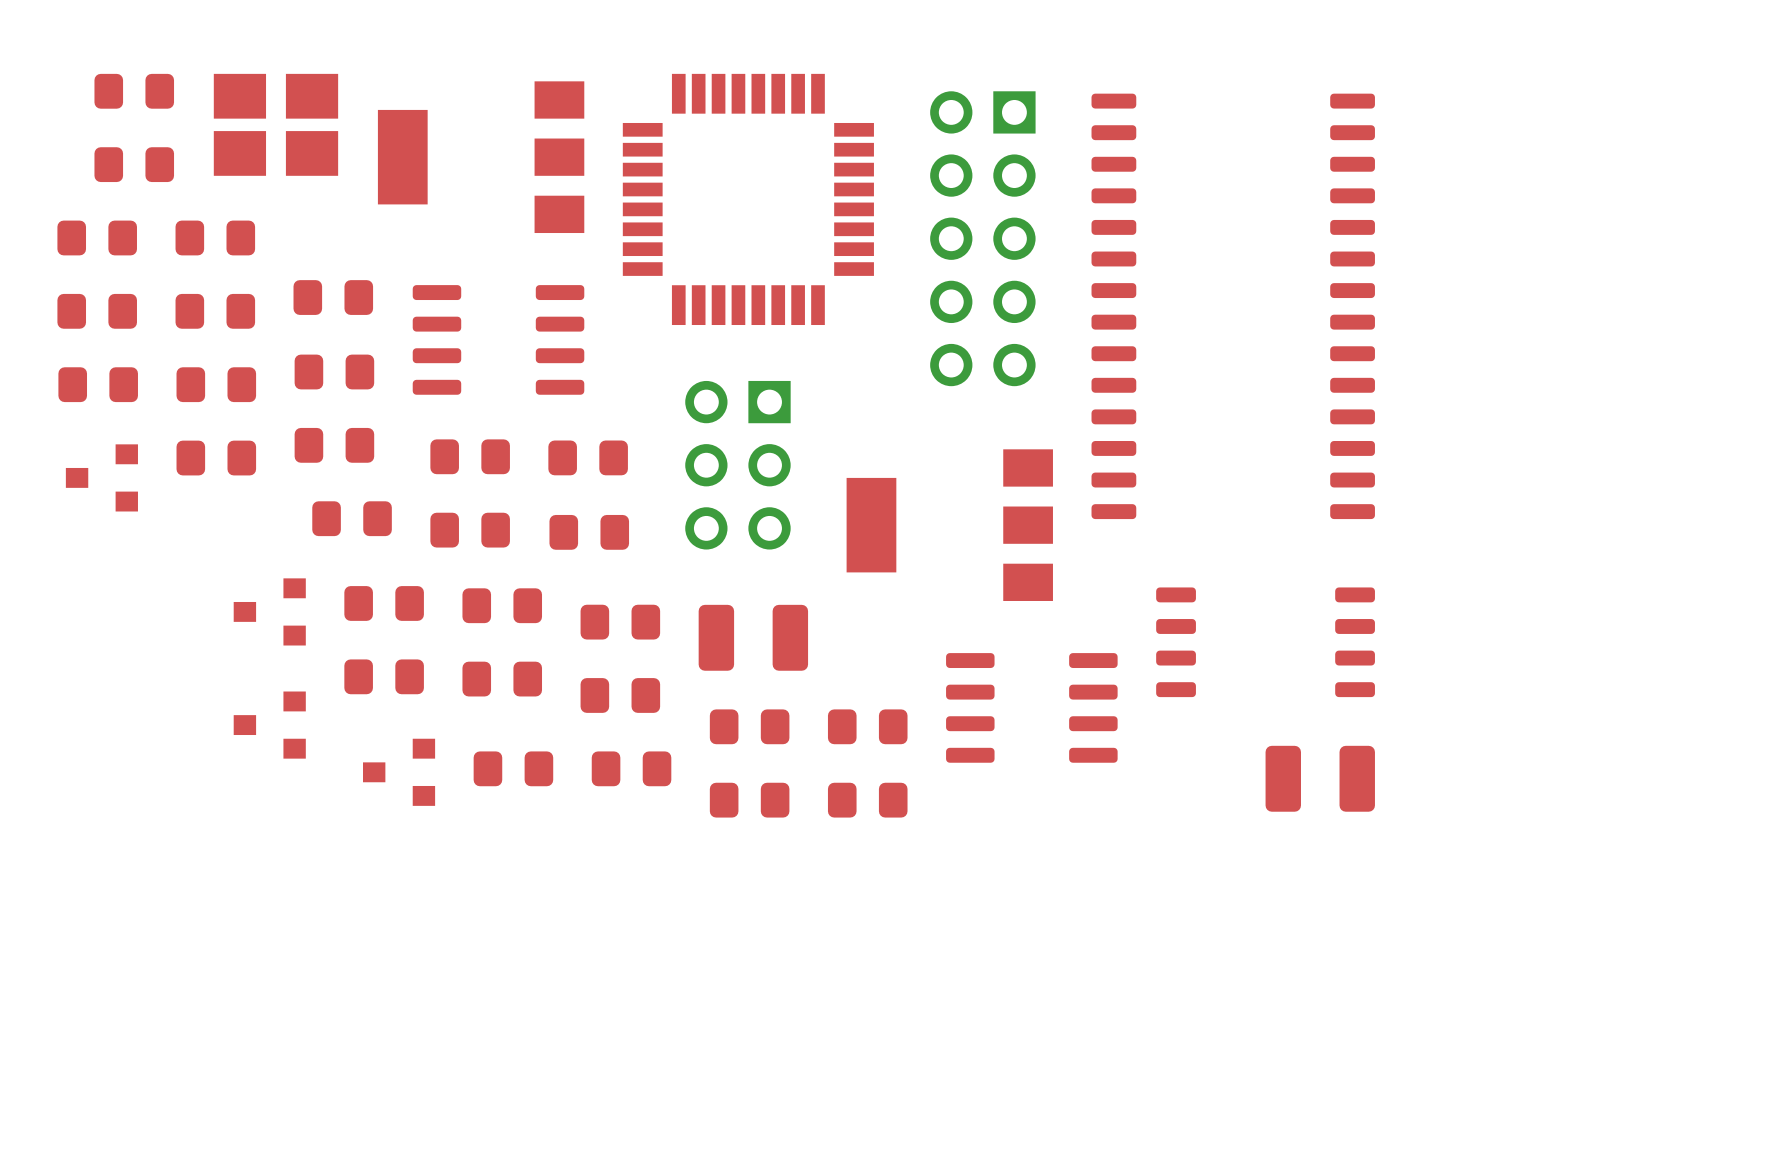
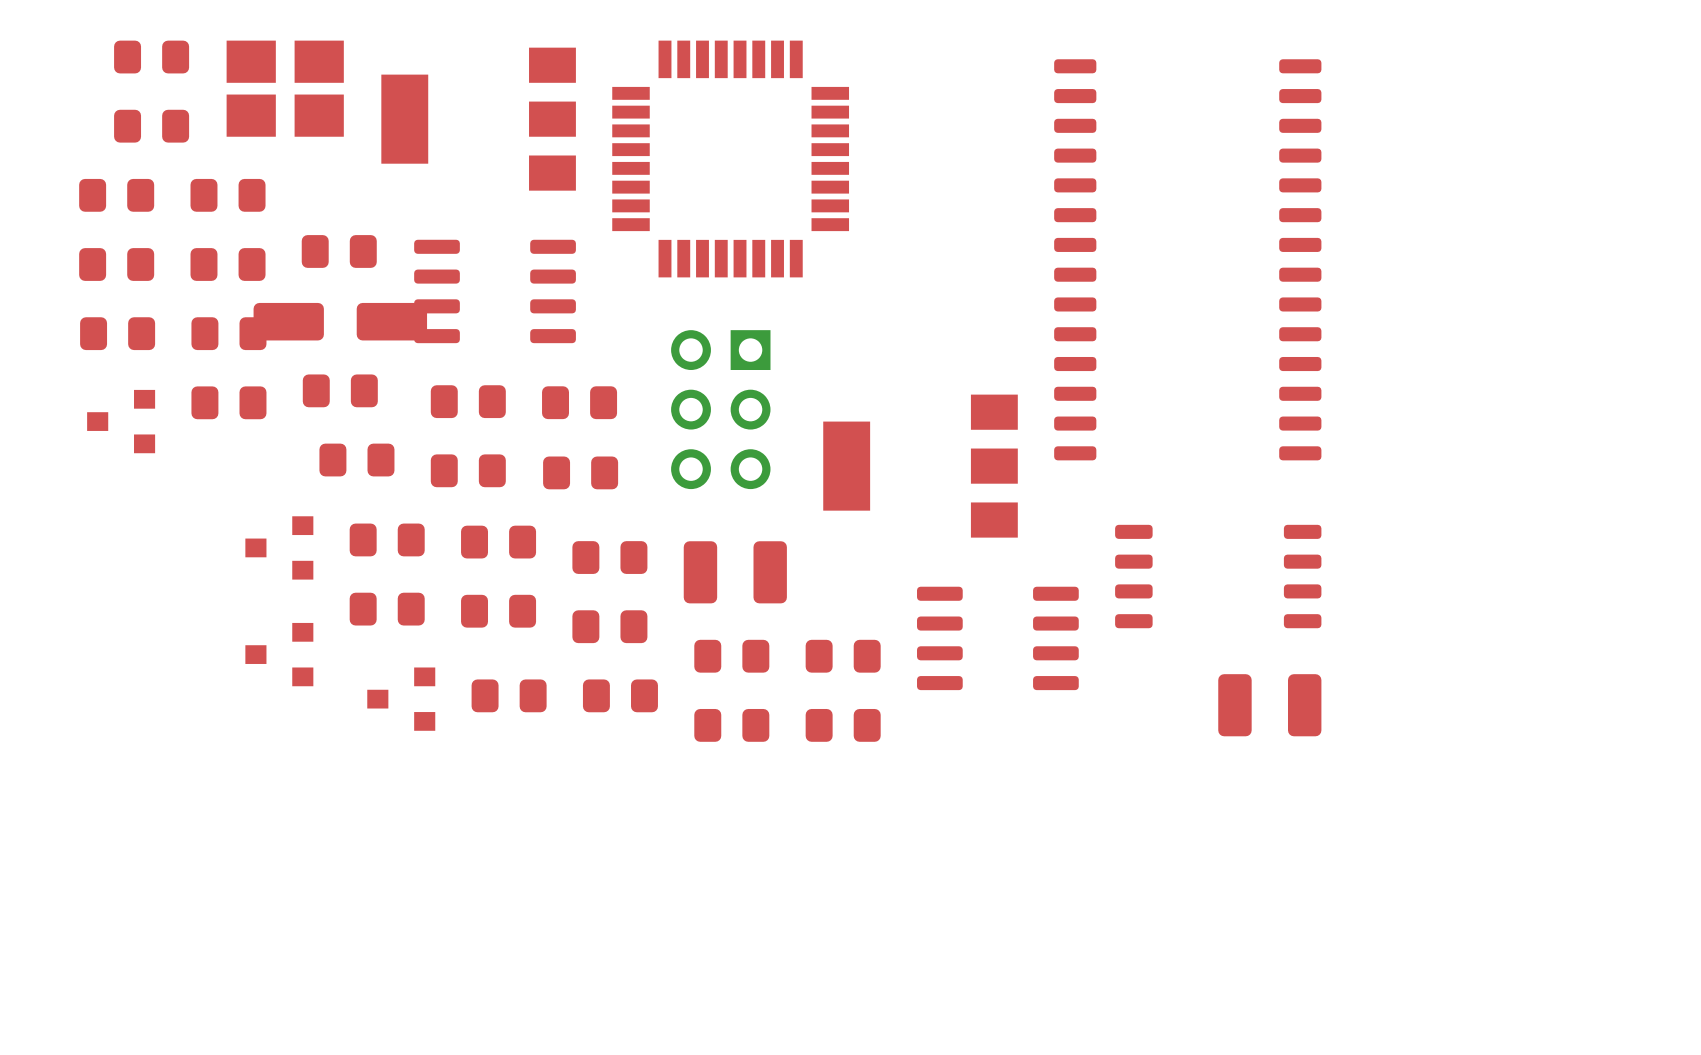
part: (982, 238) -> none
part footprint: [294, 354, 375, 390] -> [253, 302, 428, 341]

